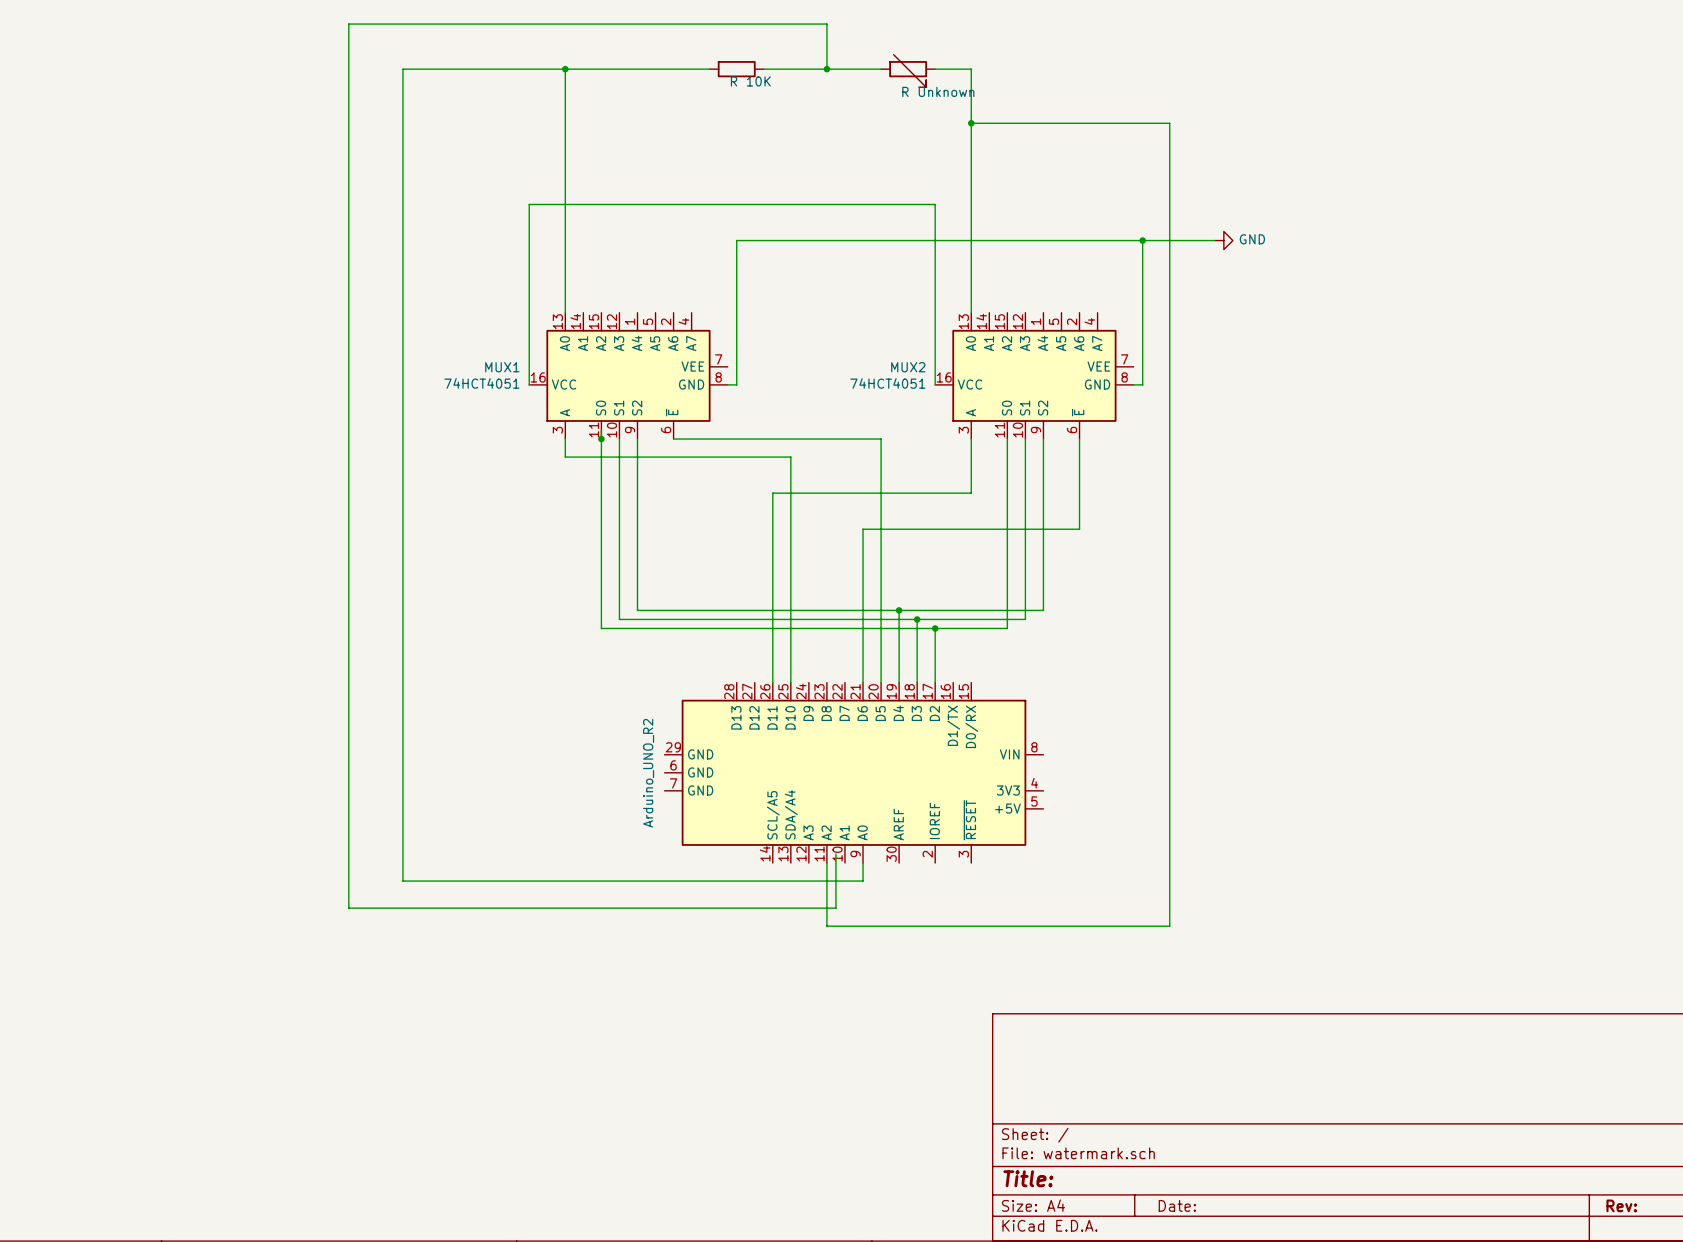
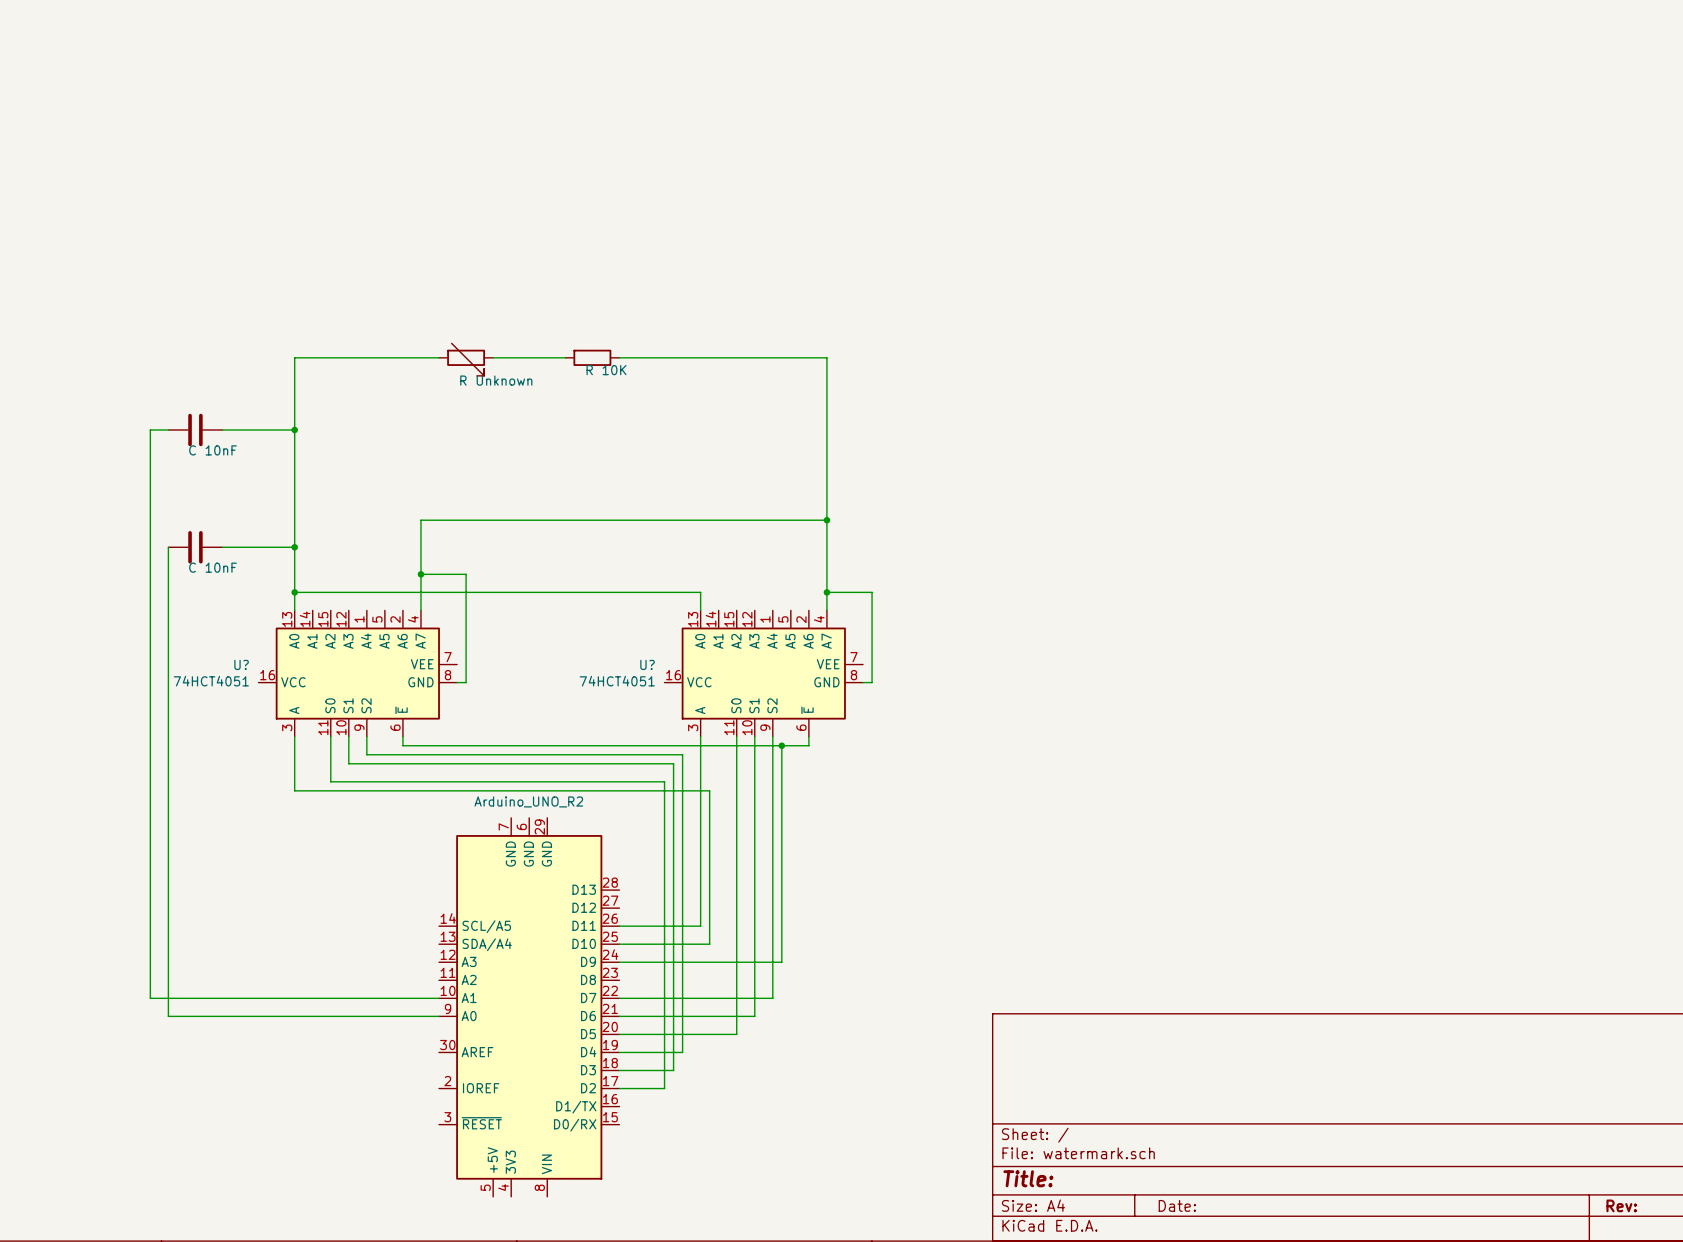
wire: (565, 69) (565, 312) -> none
junction: (565, 69) -> none
wire: (709, 69) (402, 69) (402, 736) -> none
10K position: (736, 69) -> (592, 357)
wire: (763, 69) (881, 69) -> none
wire: (826, 69) (826, 24) (348, 24) (348, 736) -> none
junction: (826, 69) -> none
wire: (935, 69) (971, 69) (971, 312) -> none
Unknown: R (908, 70) -> none
wire: (971, 123) (1169, 123) (1169, 926) (826, 926) (826, 863) -> none
junction: (971, 123) -> none
wire: (1142, 240) (1142, 384) (1133, 384) -> none
junction: (1142, 240) -> none
wire: (1214, 240) (736, 240) (736, 384) (727, 384) -> none
power symbol: GND (1223, 240) -> none
wire: none -> (439, 357) (294, 357) (294, 610)
wire: none -> (493, 357) (565, 357)
wire: none -> (619, 357) (826, 357) (826, 610)
Unknown: none -> R (466, 359)
MUX1: 74HCT4051 (628, 375) -> none
MUX2: 74HCT4051 (1034, 375) -> none
wire: (529, 384) (529, 204) (935, 204) (935, 384) -> none
wire: none -> (168, 430) (150, 430) (150, 998) (439, 998)
10nF: none -> C (195, 430)
wire: none -> (222, 430) (294, 430)
junction: none -> (294, 430)
wire: (601, 430) (601, 628) (1007, 628) (1007, 439) -> none
wire: (565, 439) (565, 457) (790, 457) (790, 682) -> none
junction: (601, 439) -> none
wire: (619, 439) (619, 619) (1025, 619) (1025, 439) -> none
wire: (637, 439) (637, 610) (1043, 610) (1043, 439) -> none
wire: (673, 439) (881, 439) (881, 682) -> none
wire: (971, 439) (971, 493) (772, 493) (772, 682) -> none
wire: (1079, 439) (1079, 529) (863, 529) (863, 682) -> (826, 592) (872, 592) (872, 682) (863, 682)
wire: none -> (826, 520) (420, 520) (420, 610)
junction: none -> (826, 520)
wire: none -> (168, 547) (168, 1016) (439, 1016)
10nF: none -> C (195, 547)
wire: none -> (222, 547) (294, 547)
junction: none -> (294, 547)
wire: none -> (420, 574) (466, 574) (466, 682) (457, 682)
junction: none -> (420, 574)
wire: none -> (294, 592) (700, 592) (700, 610)
junction: none -> (294, 592)
junction: none -> (826, 592)
wire: (899, 610) (899, 682) -> none
junction: (899, 610) -> none
wire: (917, 619) (917, 682) -> none
junction: (917, 619) -> none
wire: (935, 628) (935, 682) -> none
junction: (935, 628) -> none
U?: none -> 74HCT4051 (357, 673)
U?: none -> 74HCT4051 (763, 673)
wire: none -> (294, 736) (294, 790) (709, 790) (709, 944) (619, 944)
wire: none -> (330, 736) (330, 781) (664, 781) (664, 1088) (619, 1088)
wire: none -> (366, 736) (366, 754) (682, 754) (682, 1052) (619, 1052)
wire: none -> (700, 736) (700, 926) (619, 926)
wire: none -> (736, 736) (736, 1034) (619, 1034)
wire: none -> (754, 736) (754, 1016) (619, 1016)
wire: none -> (772, 736) (772, 998) (619, 998)
wire: (402, 745) (402, 881) (863, 881) (863, 863) -> (402, 745) (808, 745) (808, 736)
wire: none -> (781, 745) (781, 962) (619, 962)
junction: none -> (781, 745)
wire: (348, 763) (348, 908) (835, 908) (835, 853) -> (348, 763) (673, 763) (673, 1070) (619, 1070)
part: Arduino_UNO_R2 (853, 772) -> none
part: none -> Arduino_UNO_R2 (529, 1007)

